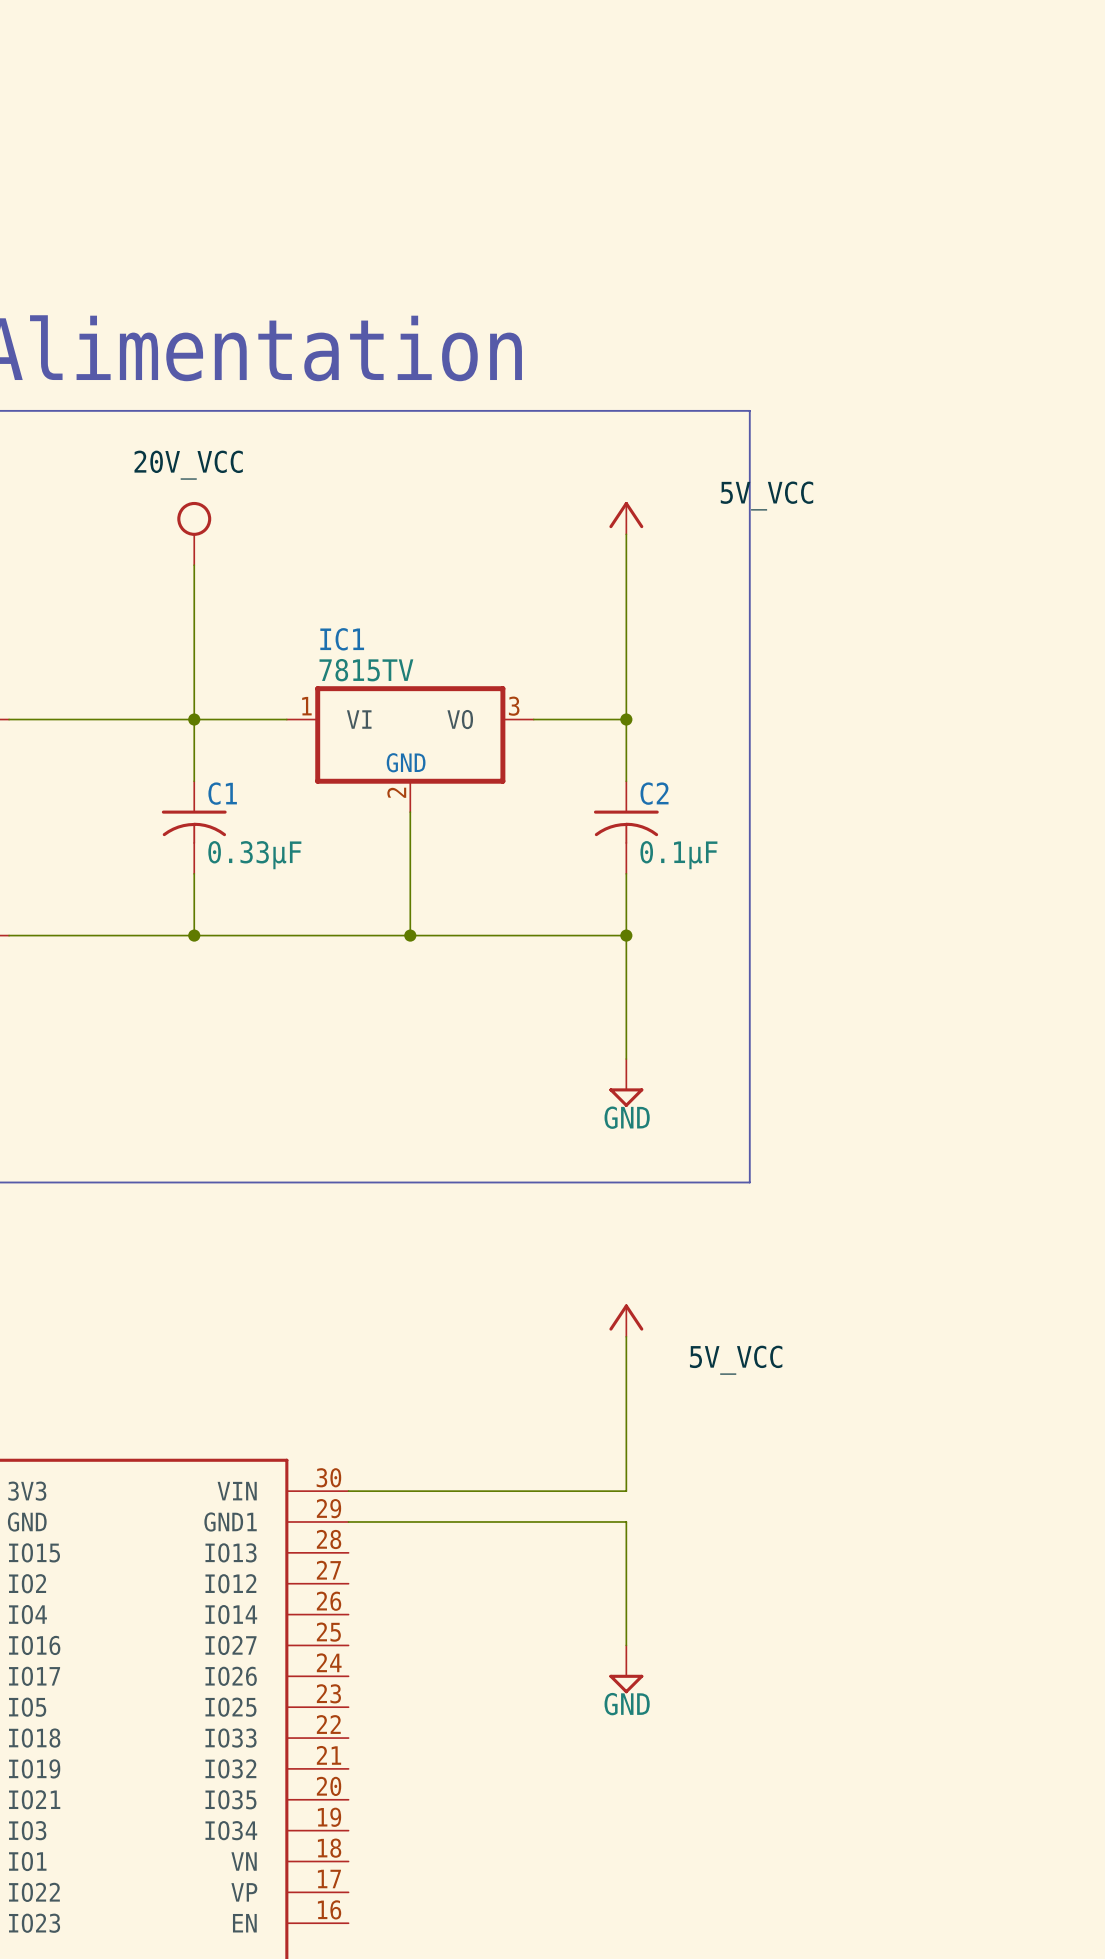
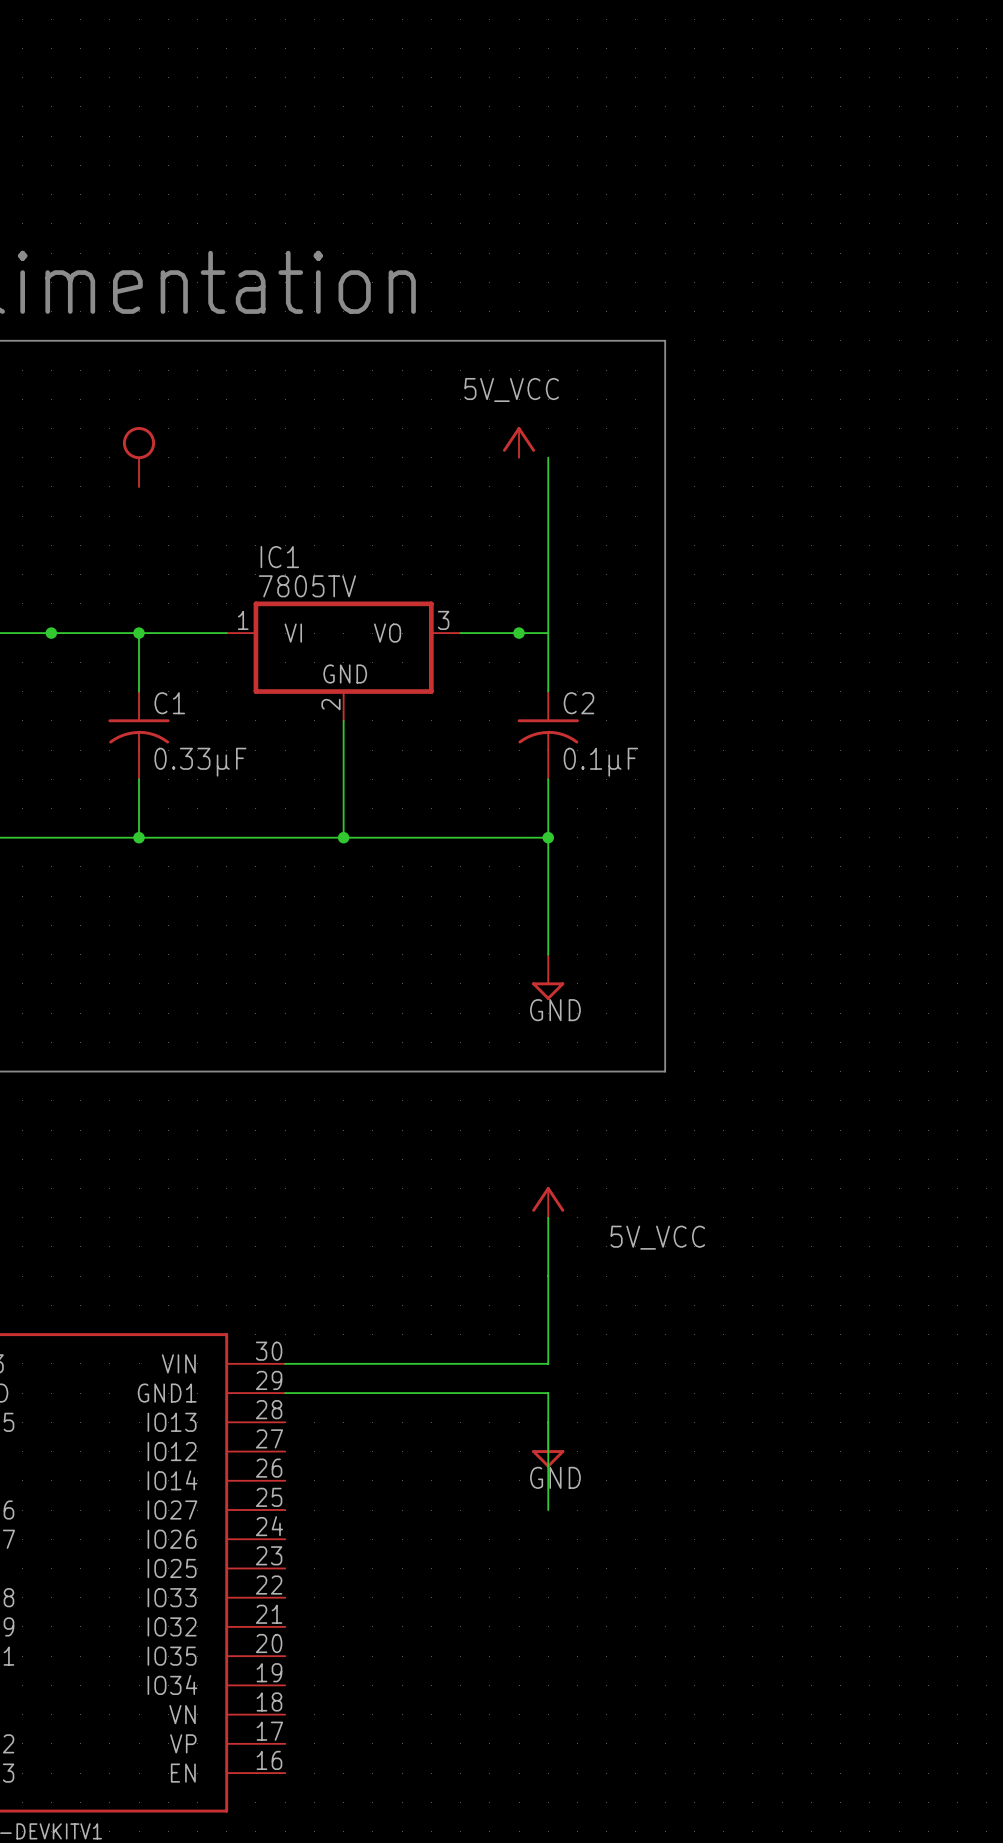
label: 20V_VCC (188, 465) -> none
label position: 5V_VCC (767, 495) -> 5V_VCC (511, 389)
power symbol position: (626, 518) -> (519, 442)
wire: (194, 565) (194, 719) -> none
IC1 value: 7815TV (366, 670) -> 7805TV (307, 586)
junction: none -> (51, 633)
junction position: (626, 719) -> (519, 633)
power symbol position: GND (626, 1669) -> GND (548, 1444)

